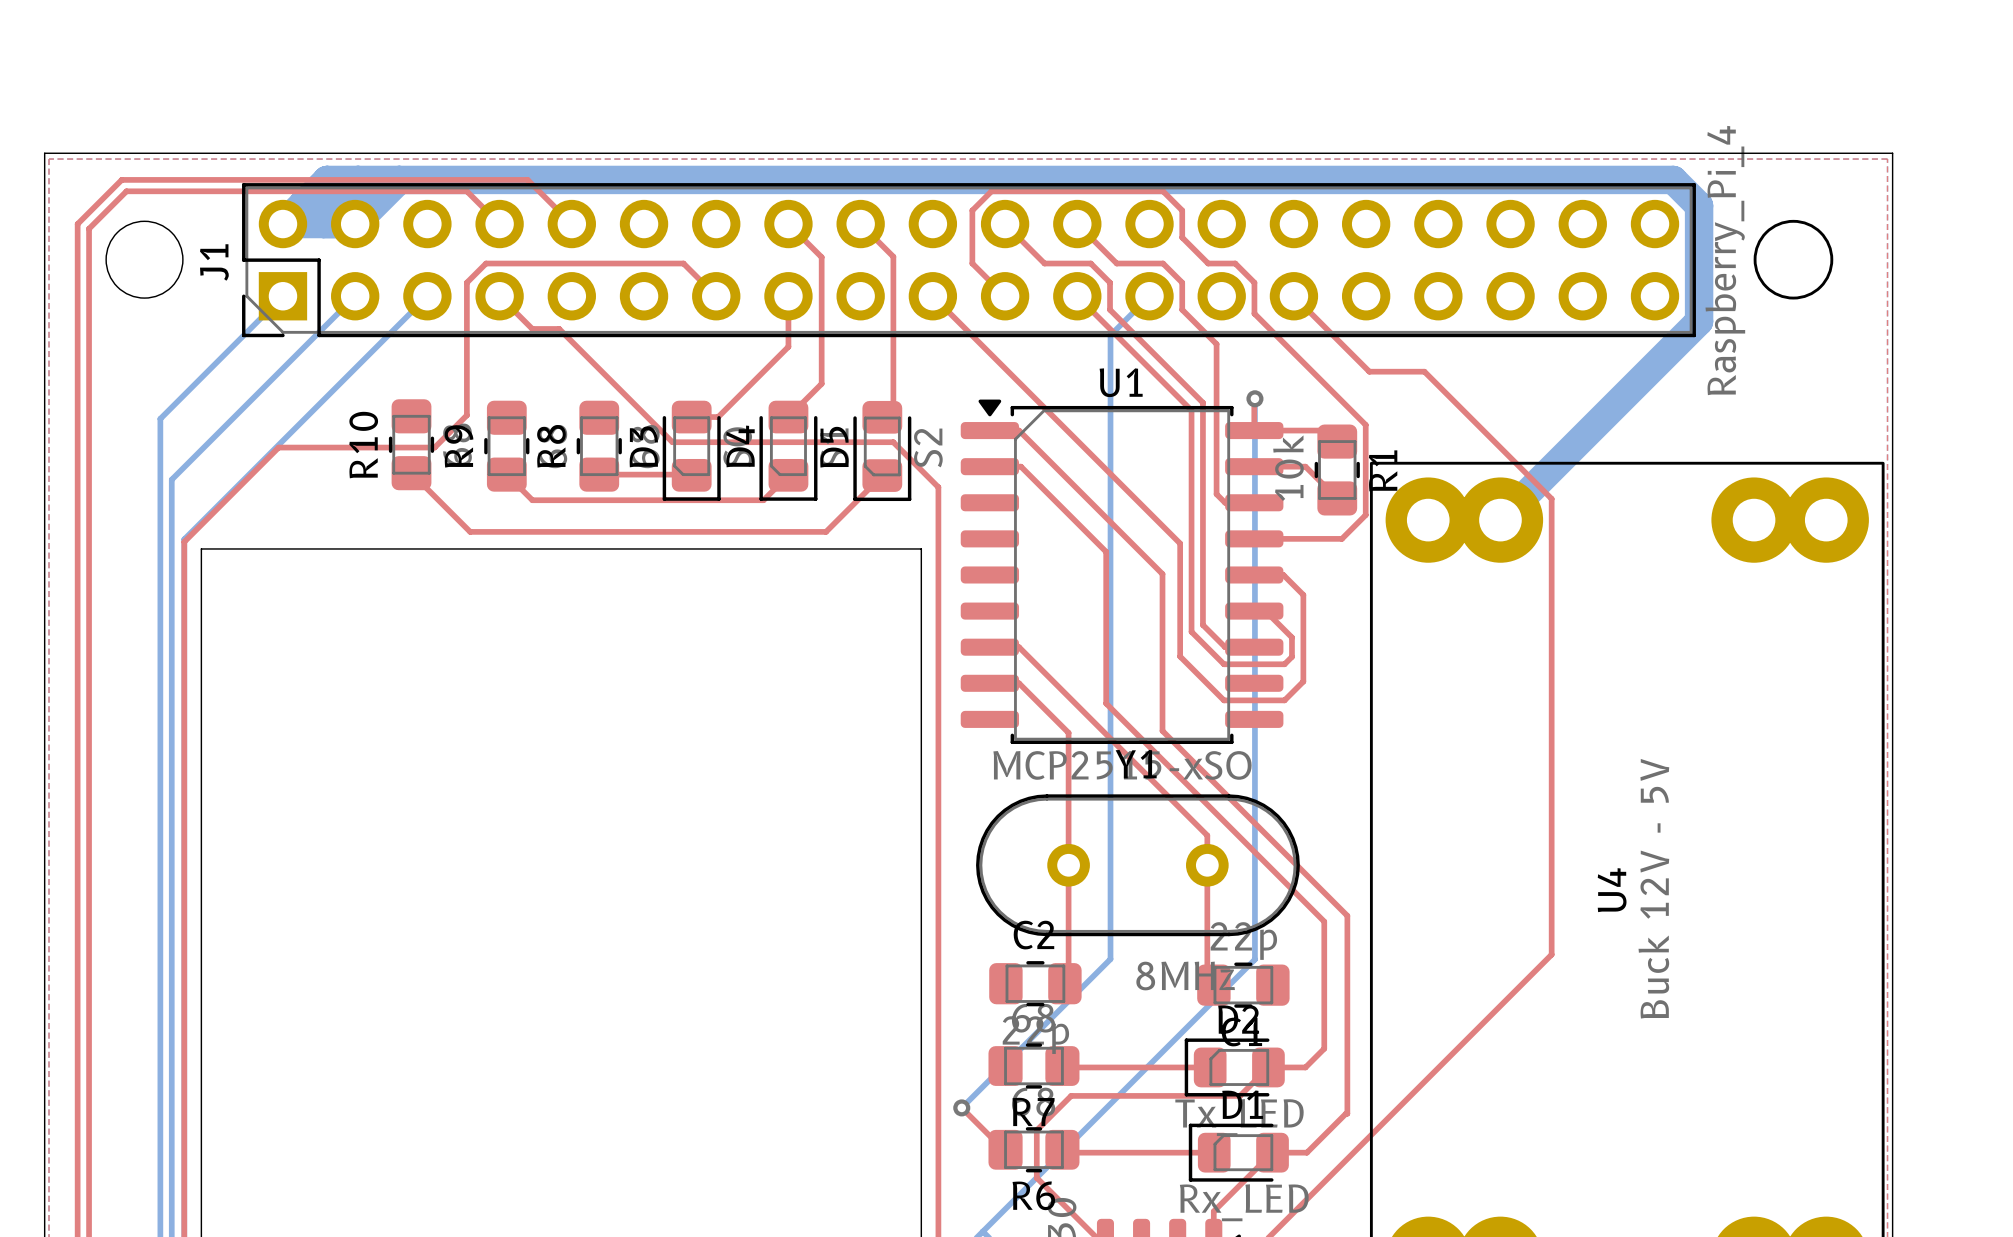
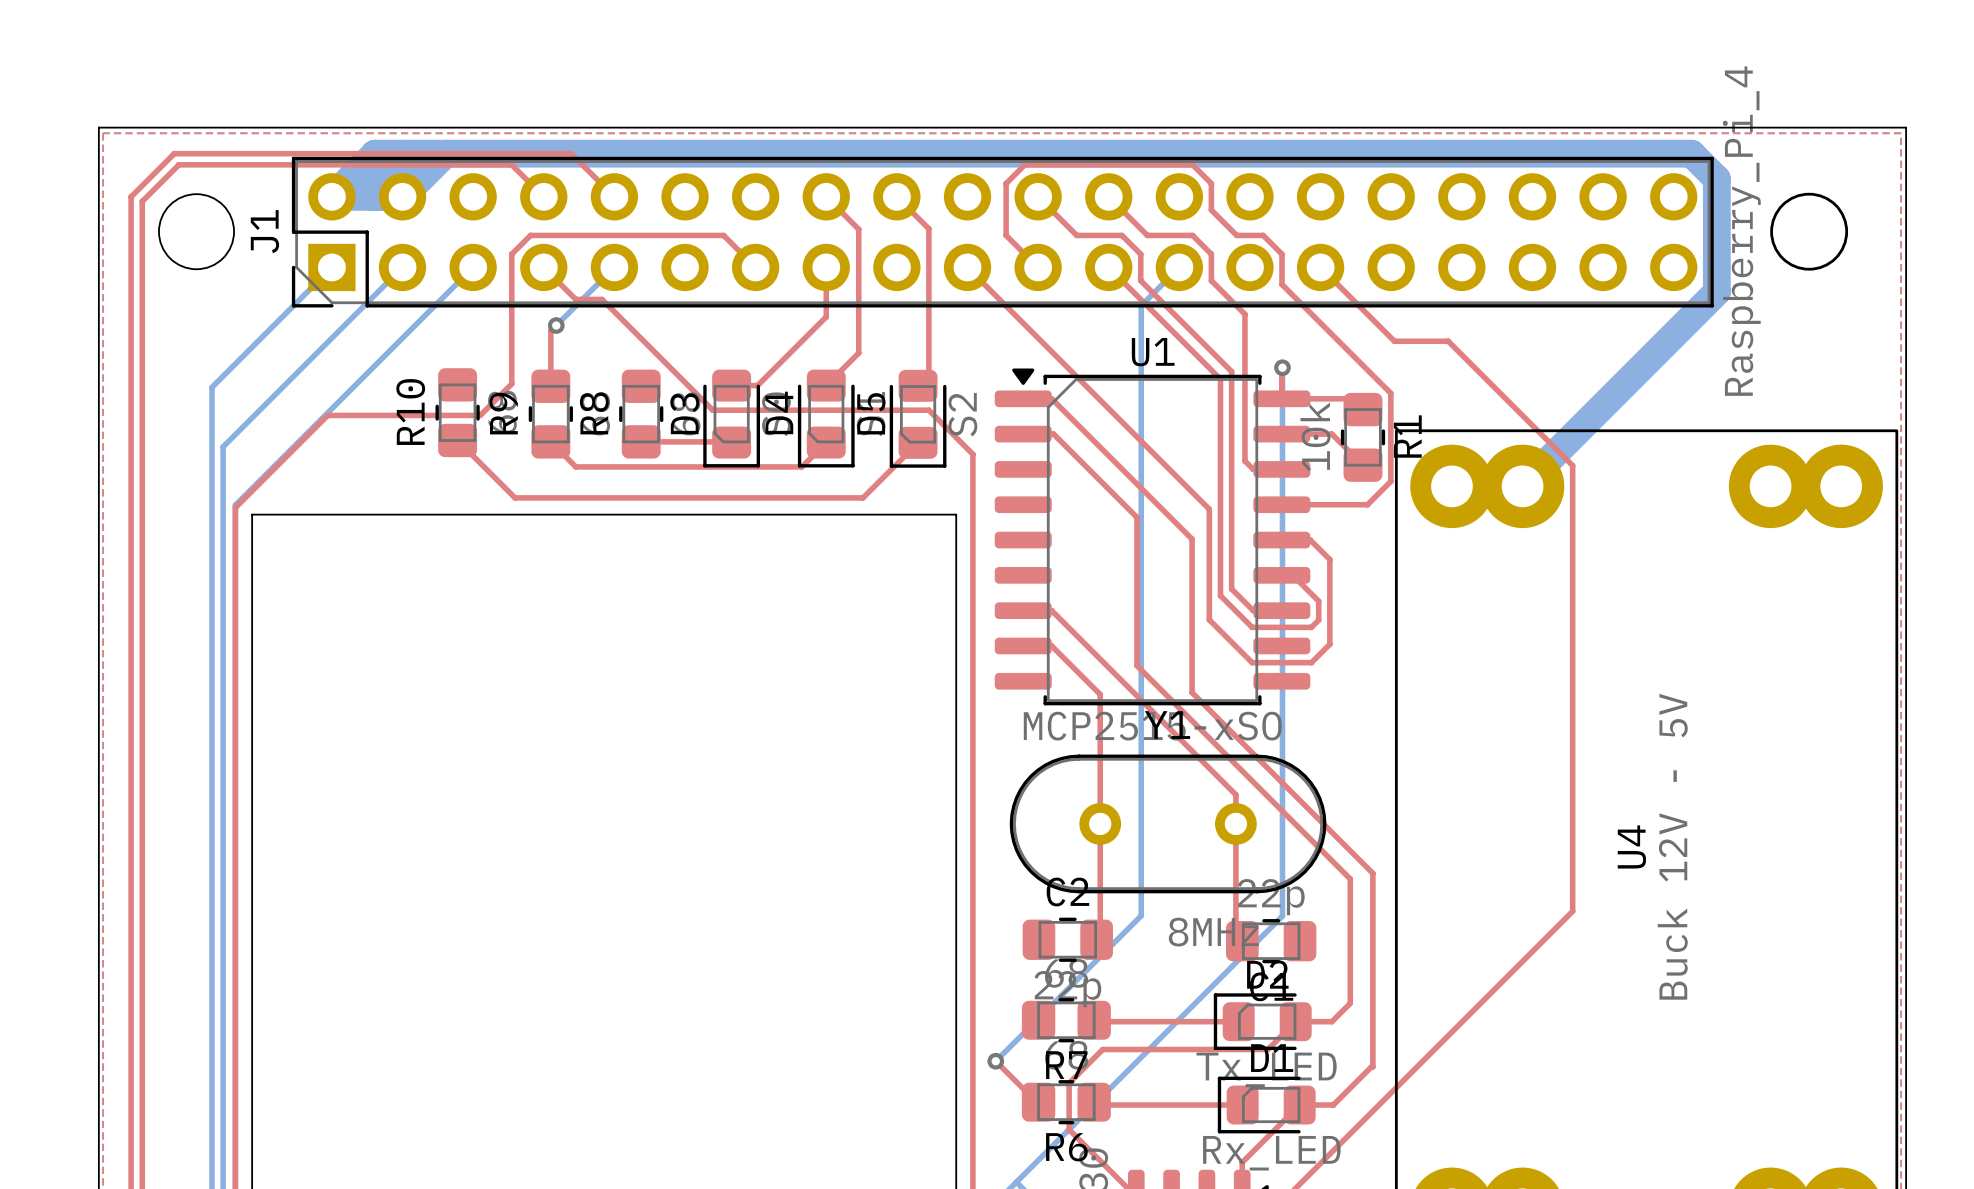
bottom track: none -> (614, 267) (556, 325)
top track: none -> (556, 325) (550, 330) (550, 386)
via: none -> (556, 325)

